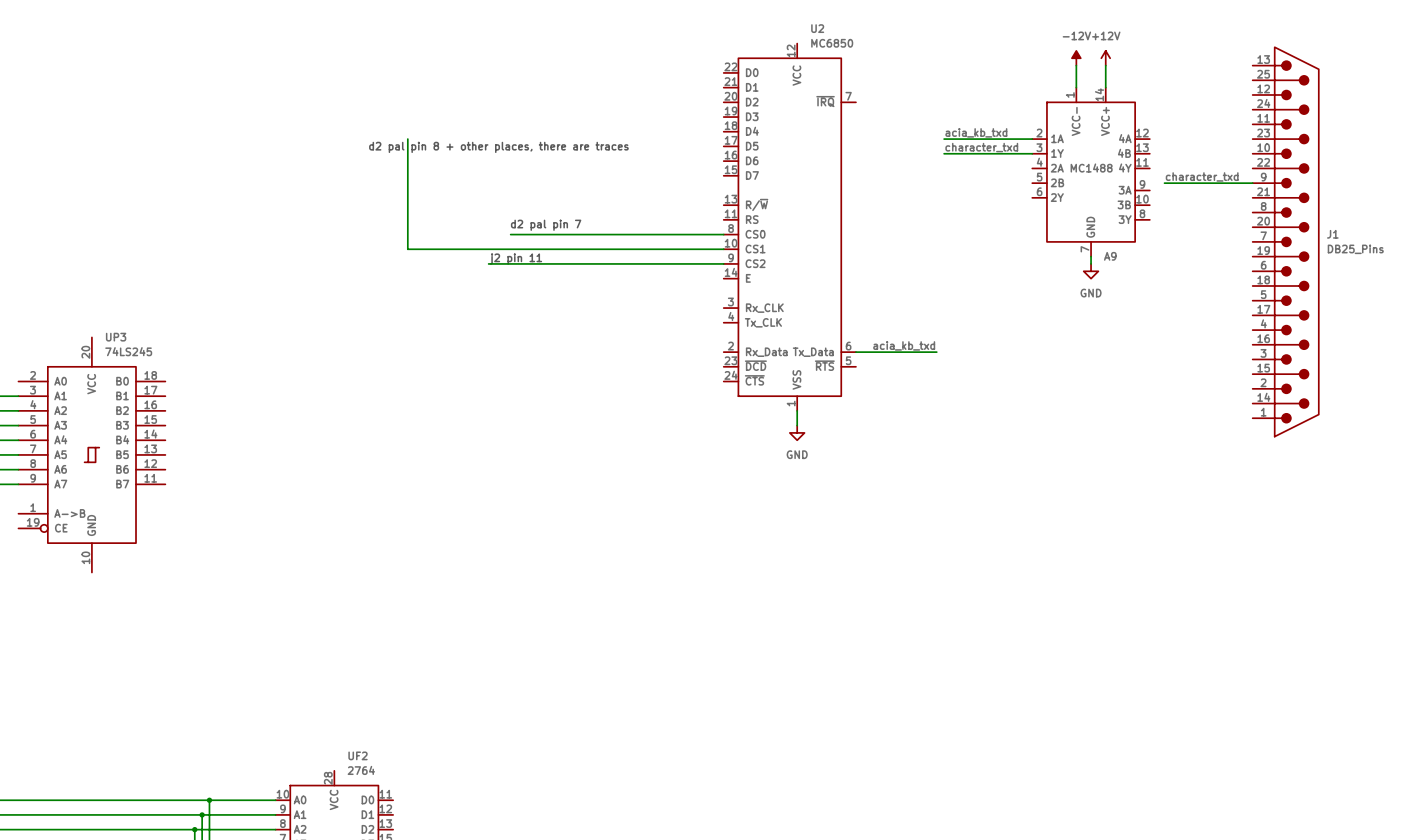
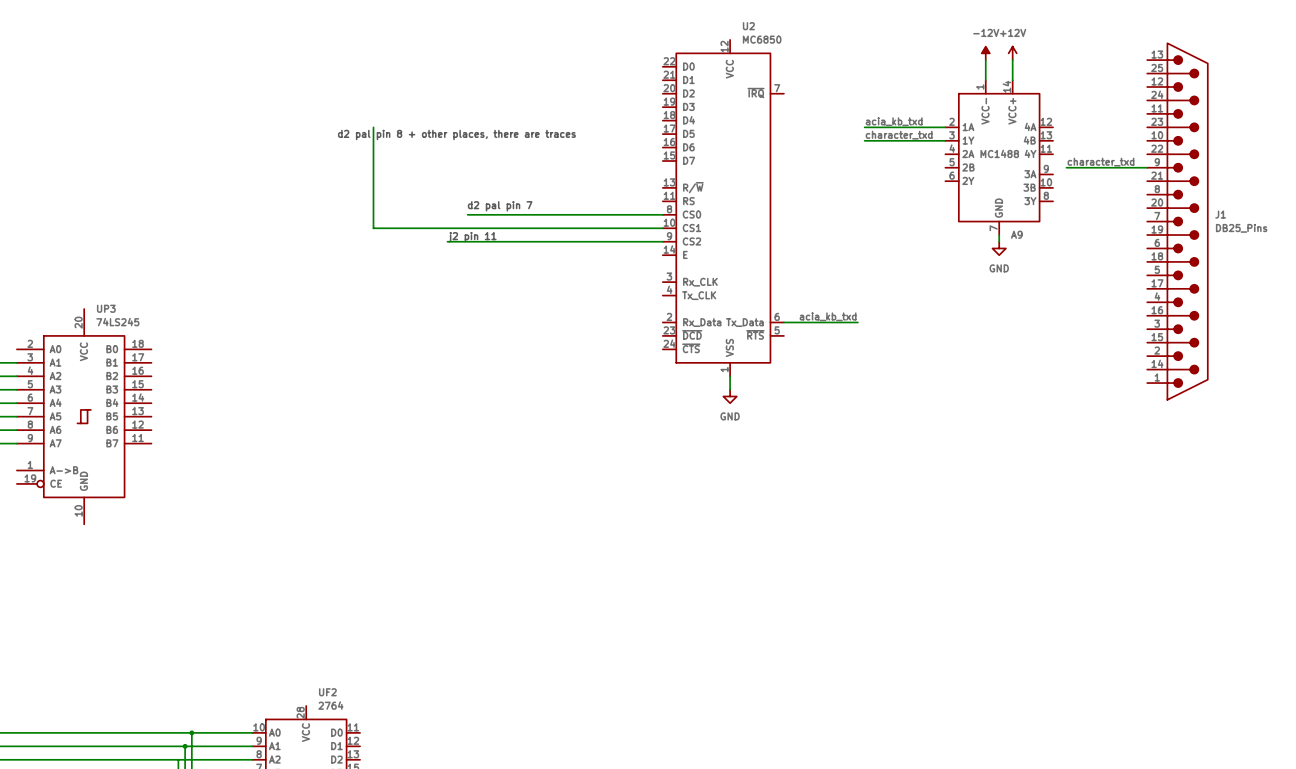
junction: (194, 829) -> none

